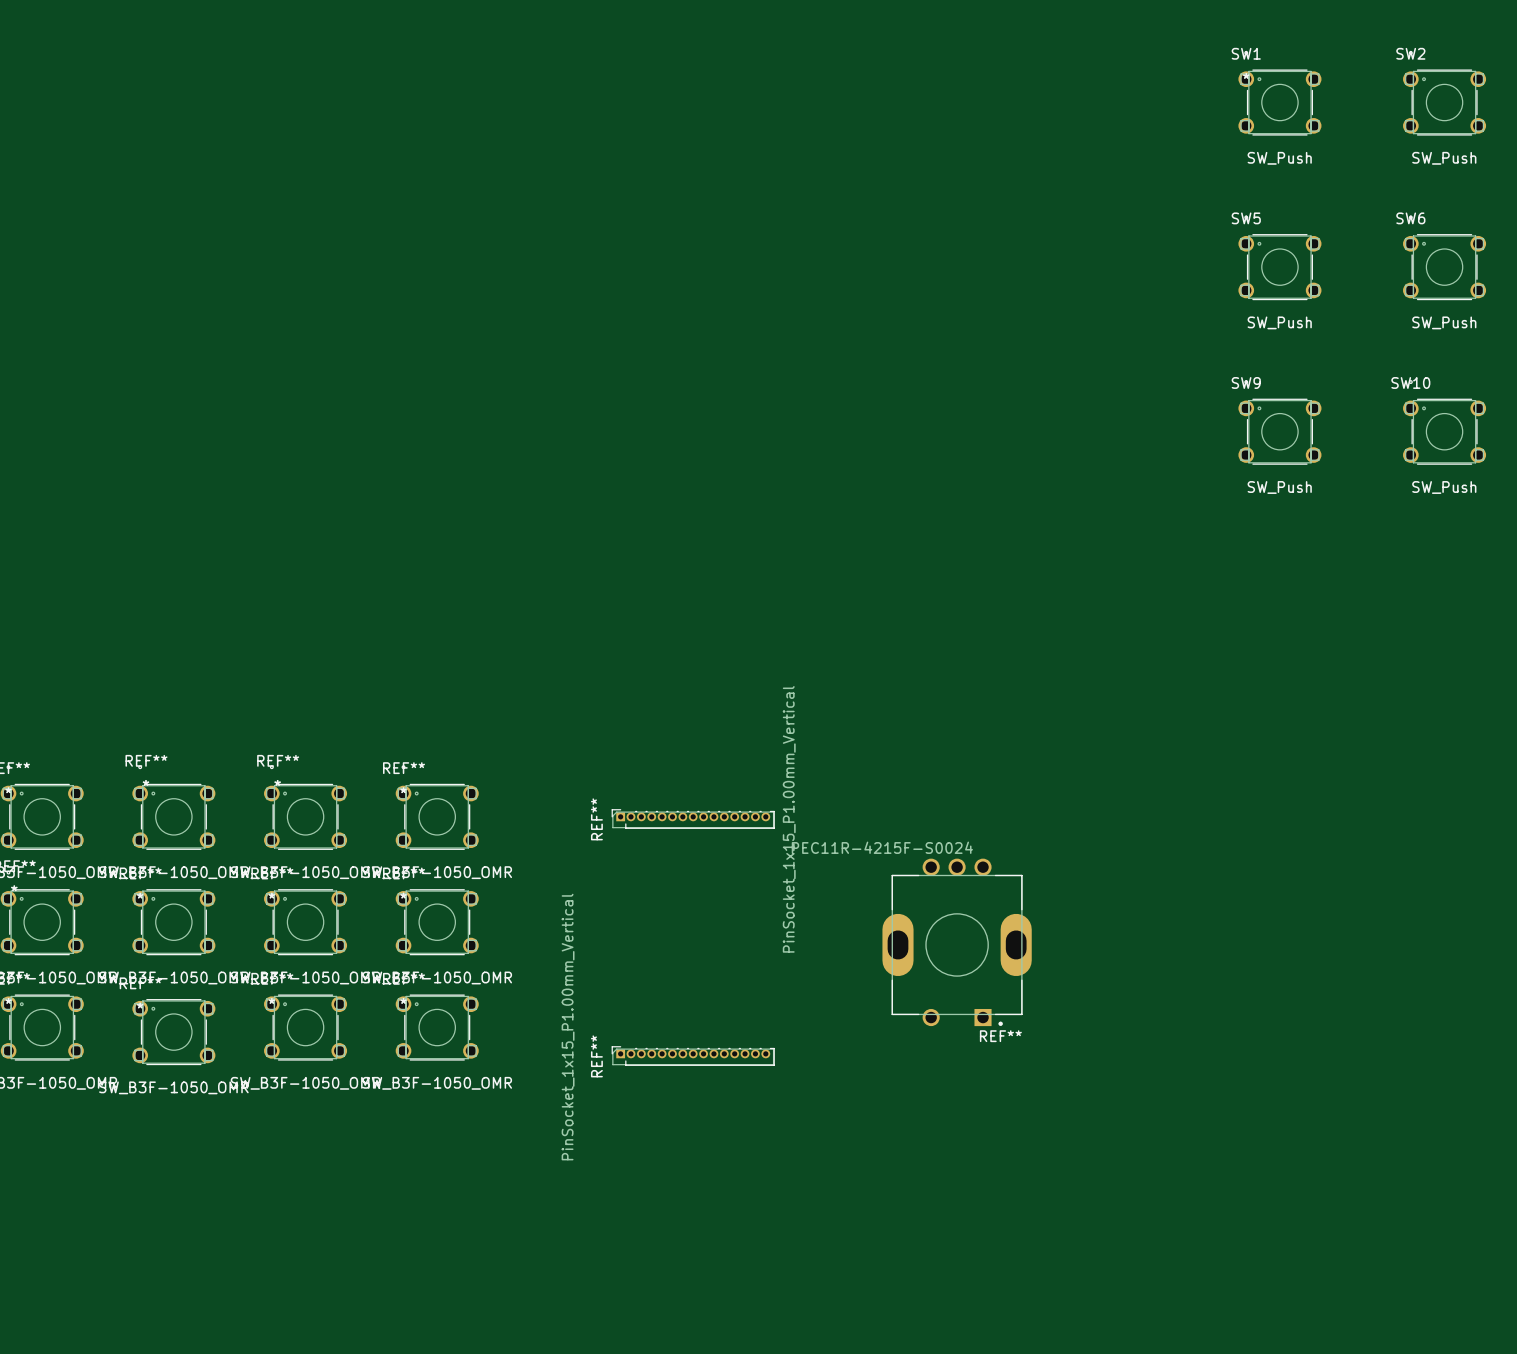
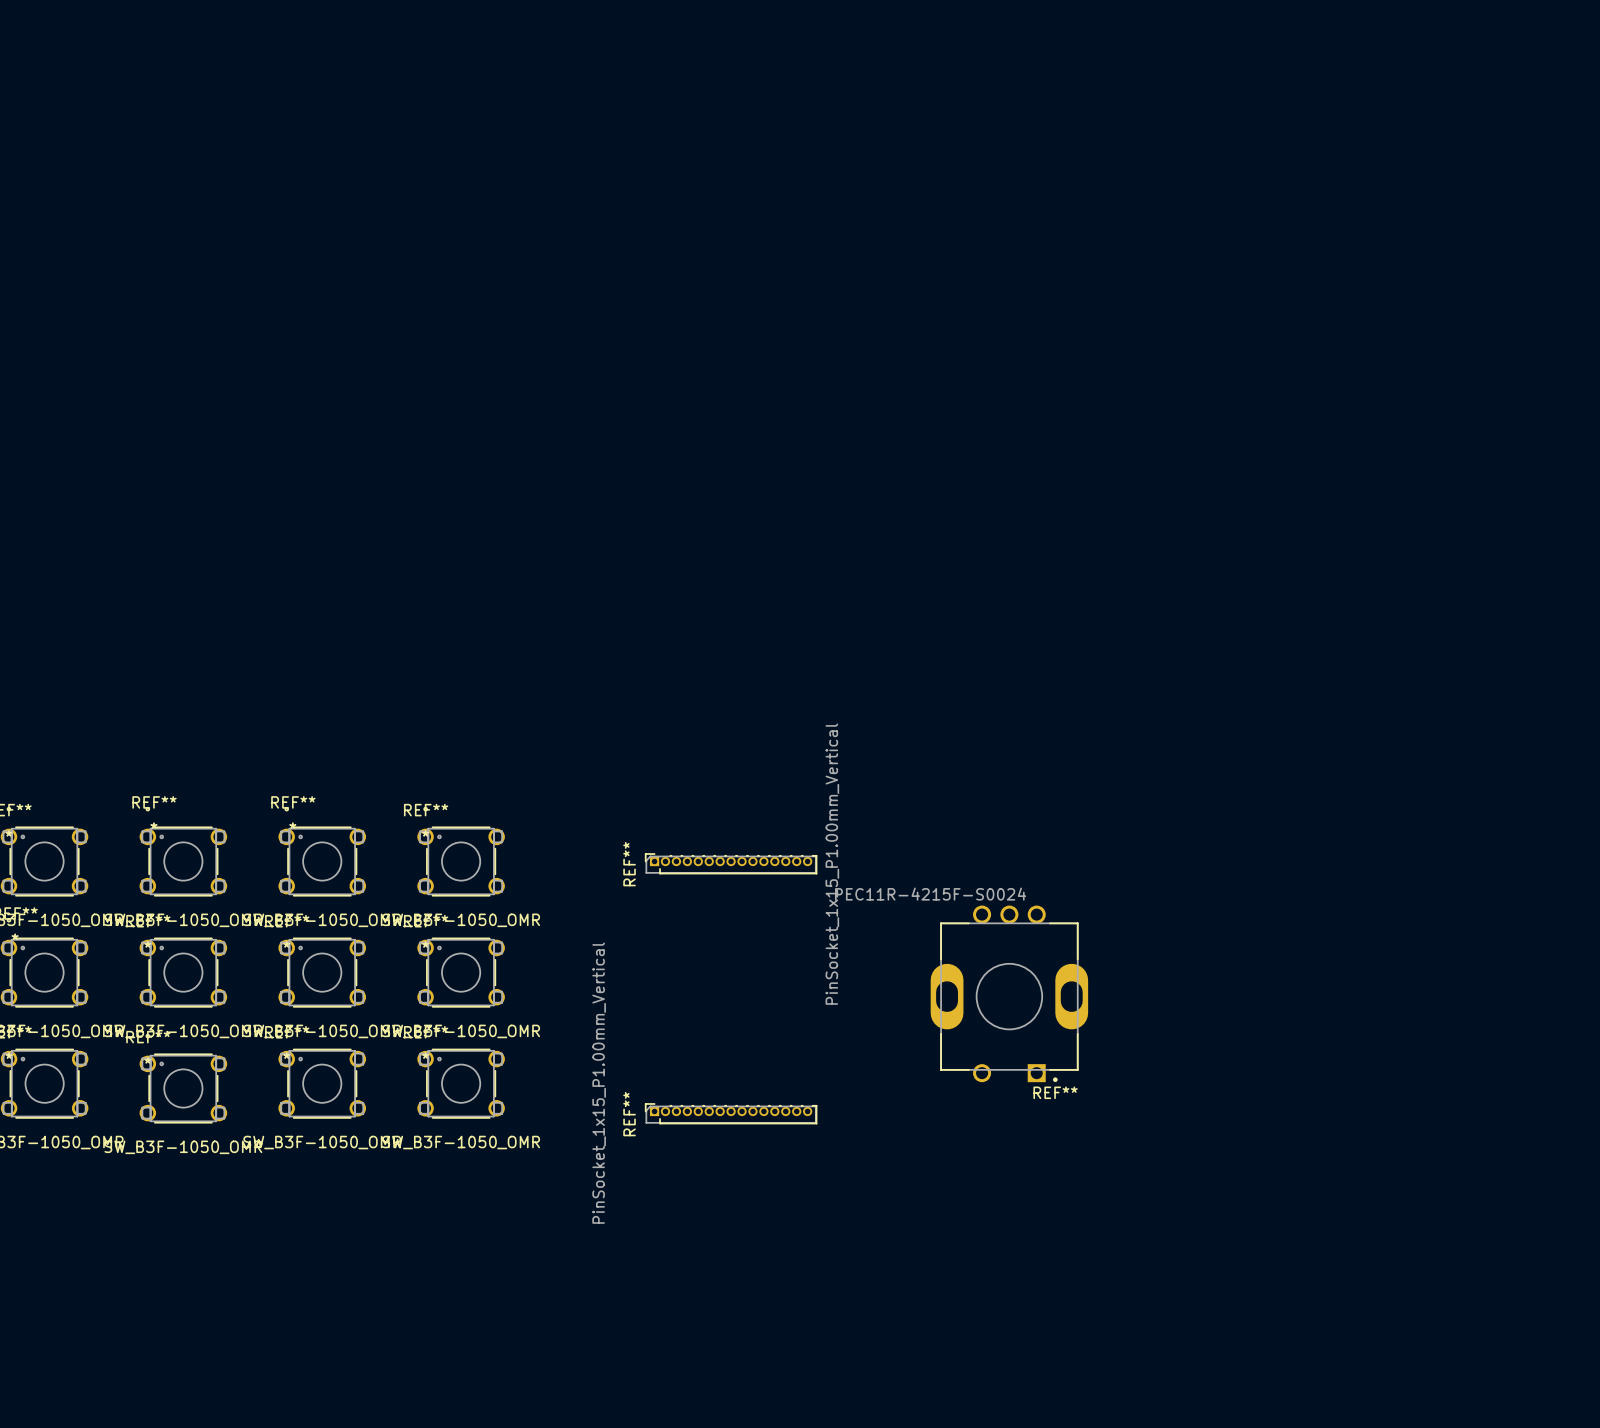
SW1: SW_Push (1279, 93) -> none
SW2: SW_Push (1444, 93) -> none
SW5: SW_Push (1279, 257) -> none
SW6: SW_Push (1444, 257) -> none
SW9: SW_Push (1279, 422) -> none
SW10: SW_Push (1444, 422) -> none

